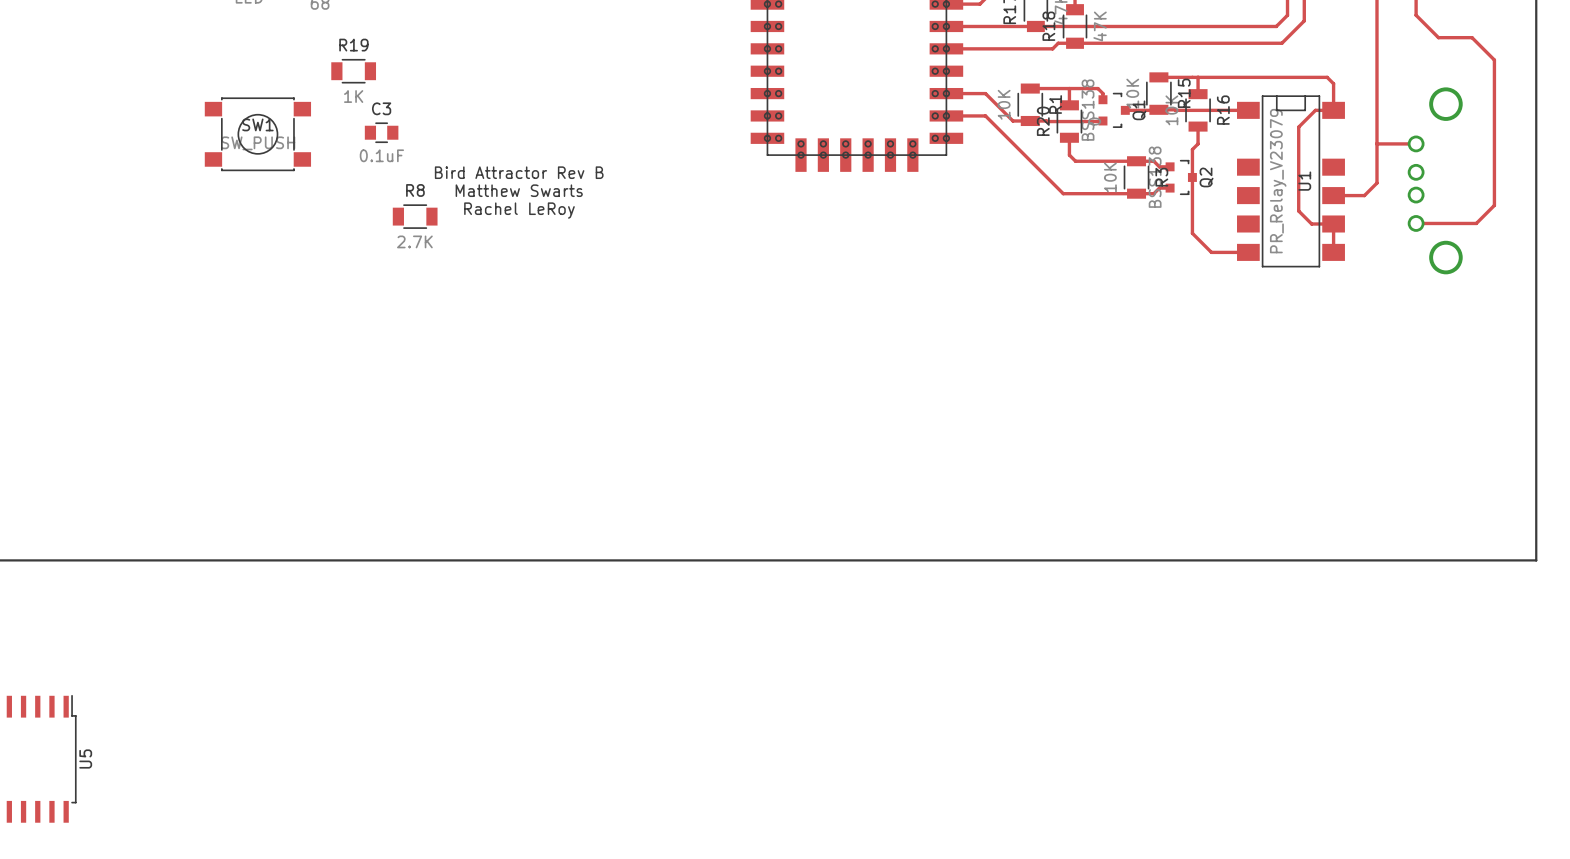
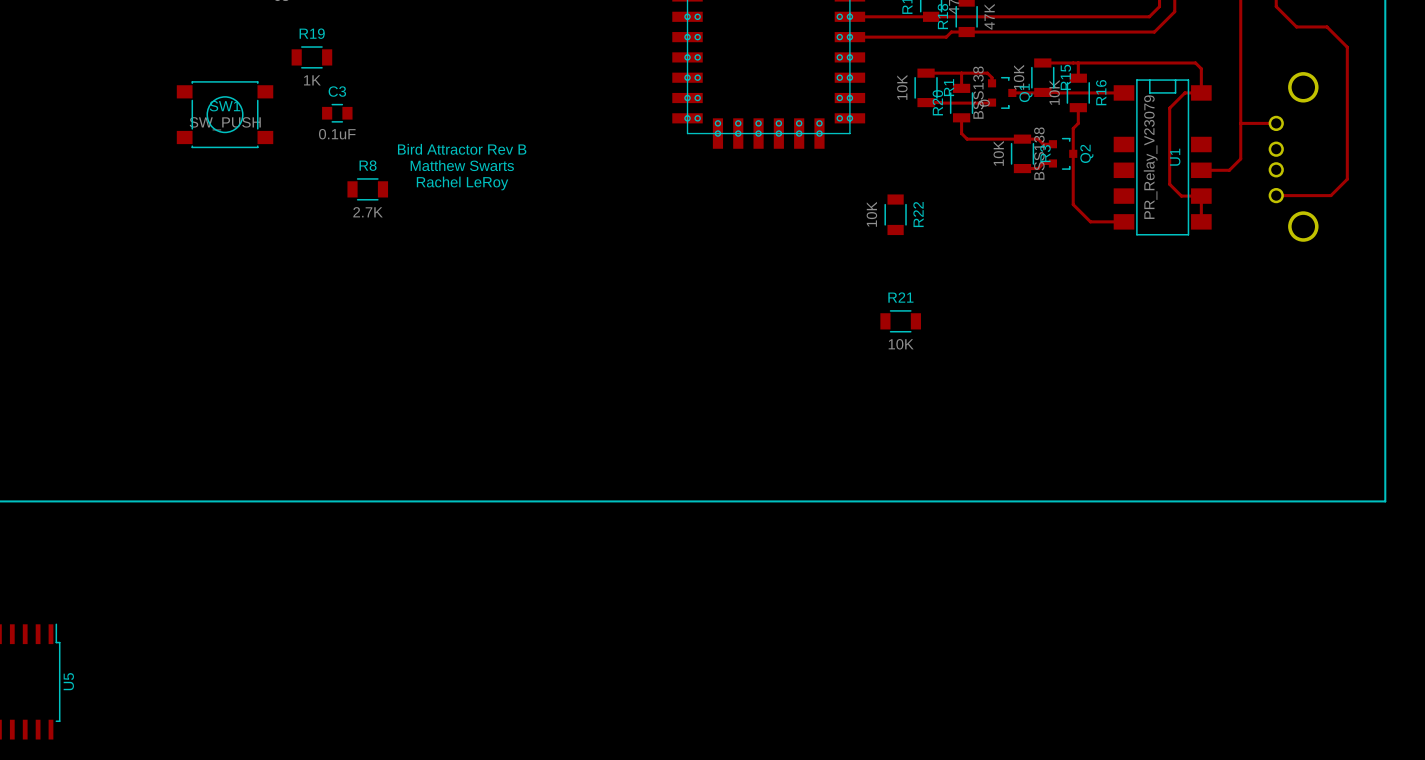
track: (946, 93) (985, 93) (1012, 120) (1030, 120) -> none
track: (946, 115) (985, 115) (1063, 193) (1136, 193) -> none
R22: none -> 10K (895, 214)
R21: none -> 10K (900, 321)

